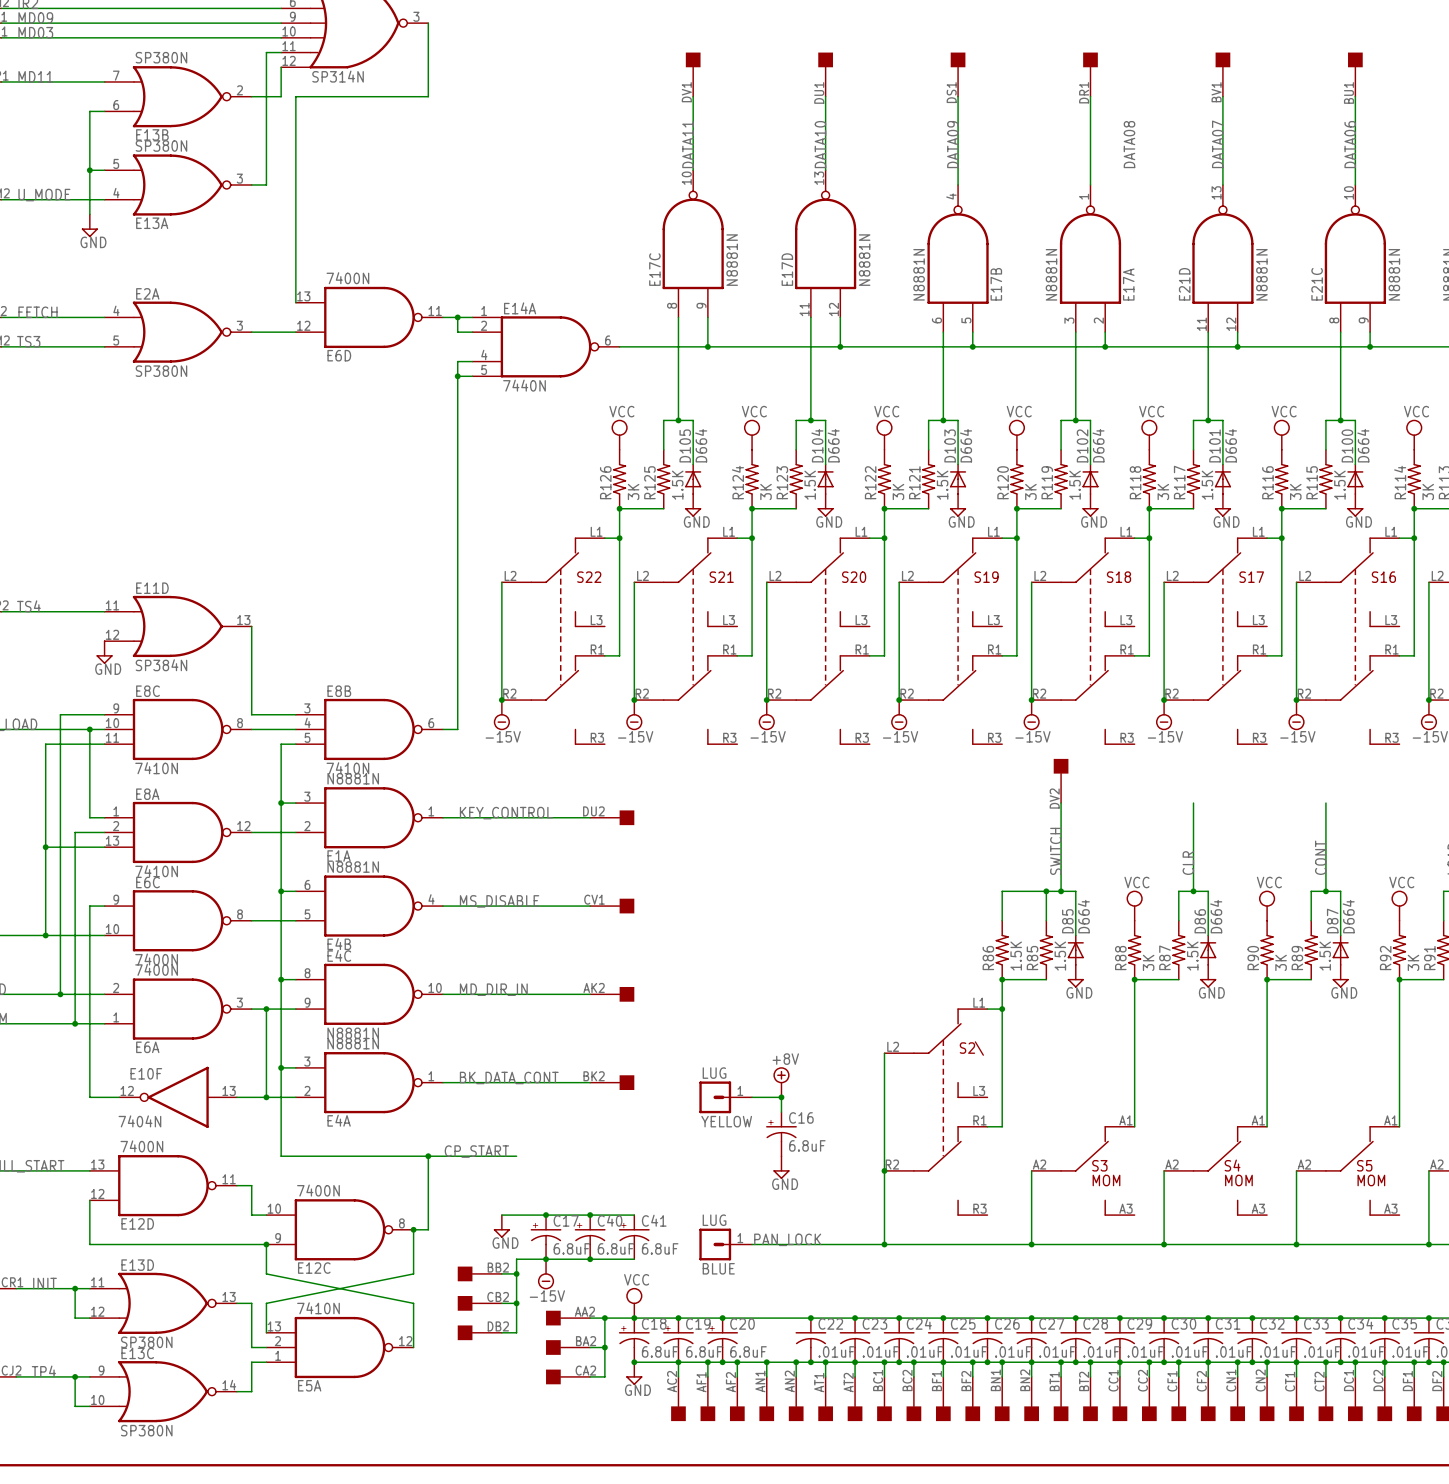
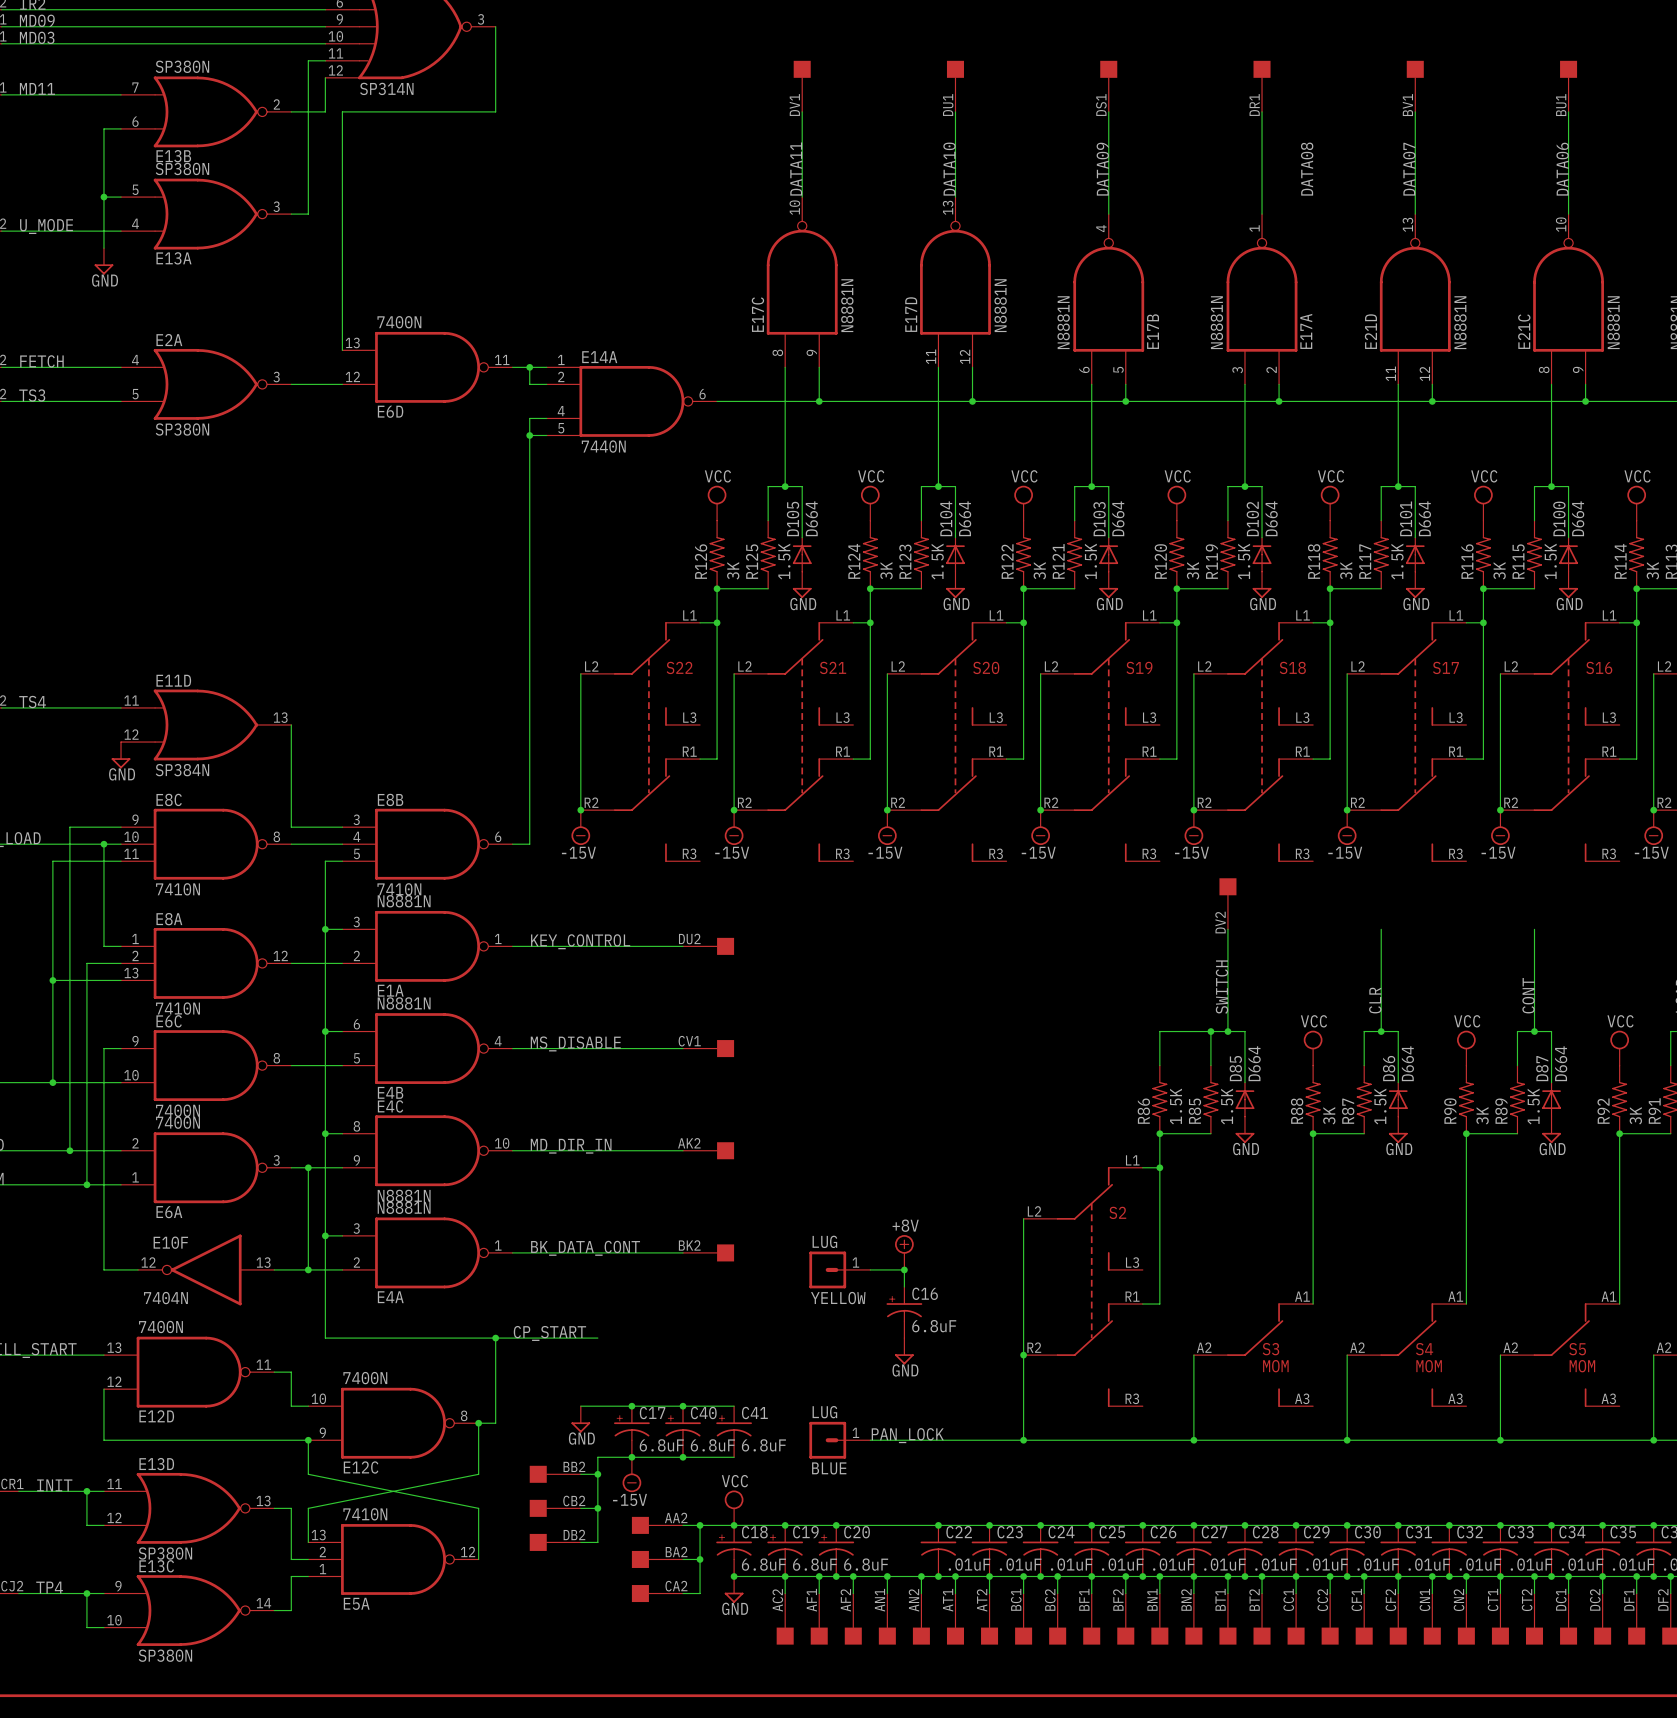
S2\ name: S2\ (971, 1048) -> S2 (1117, 1212)

